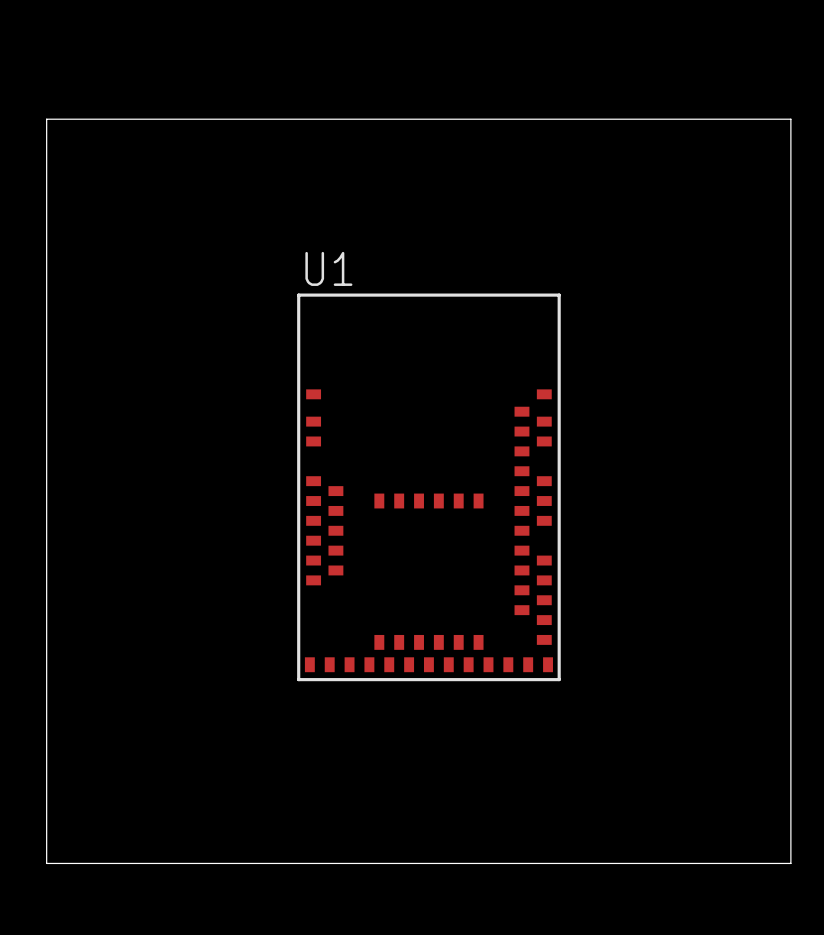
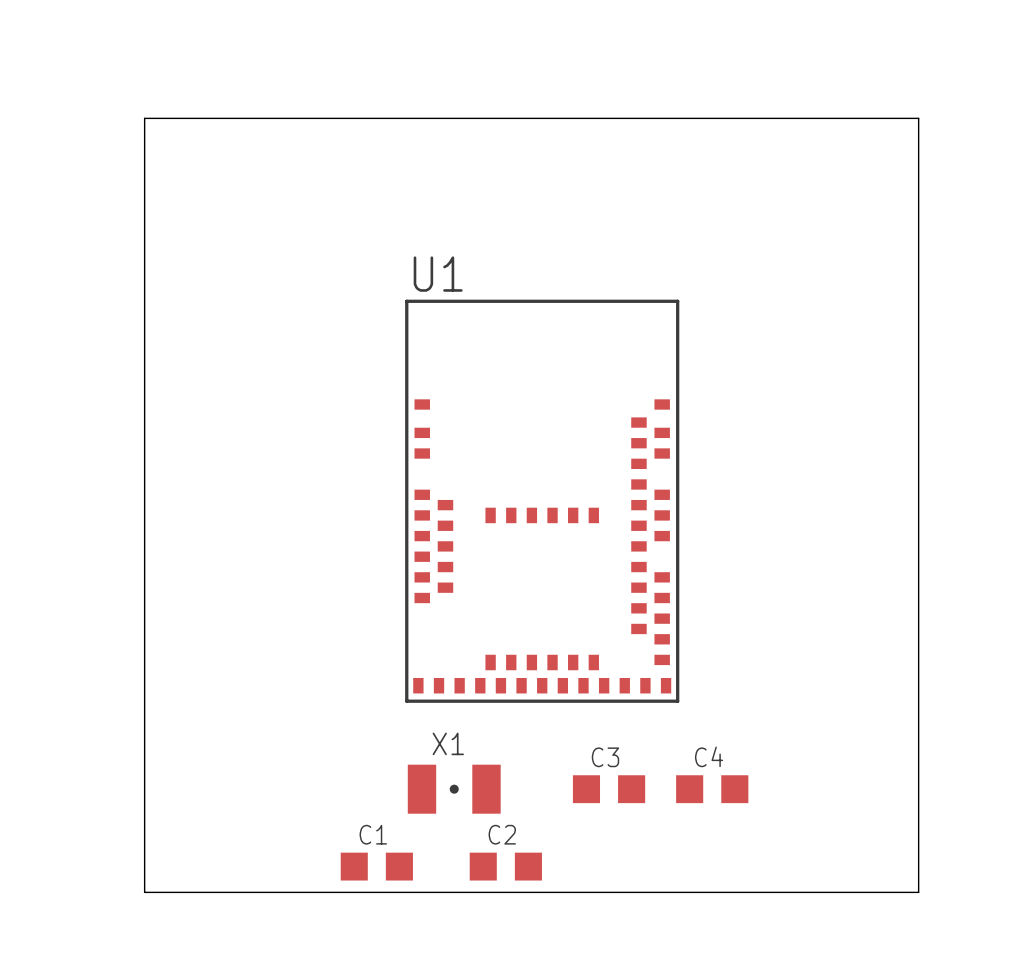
X1: none -> (454, 789)
C3: none -> (609, 789)
C4: none -> (712, 789)
C1: none -> (376, 866)
C2: none -> (505, 866)

